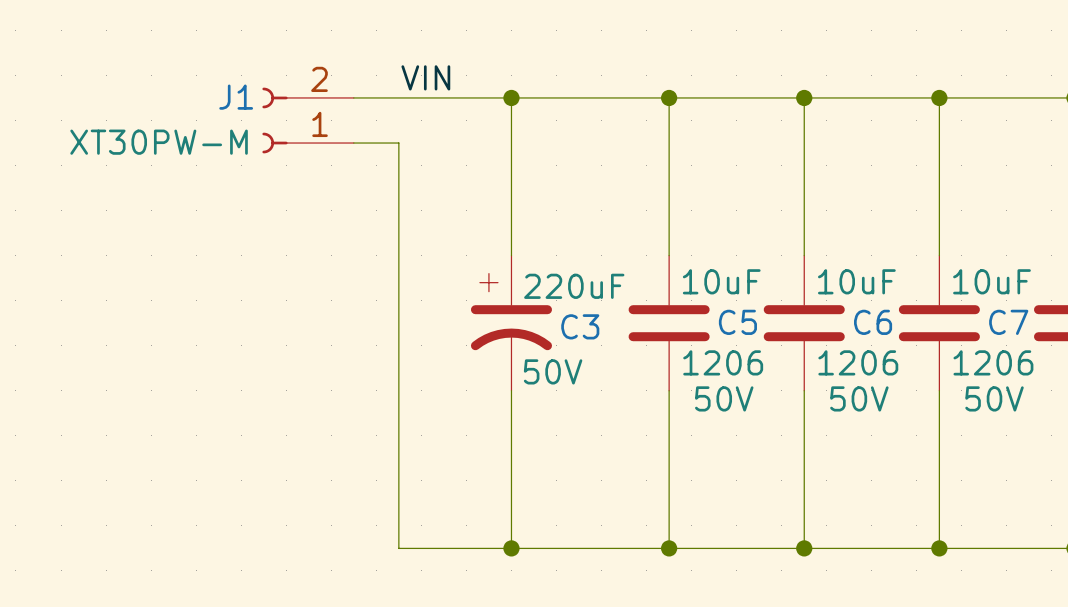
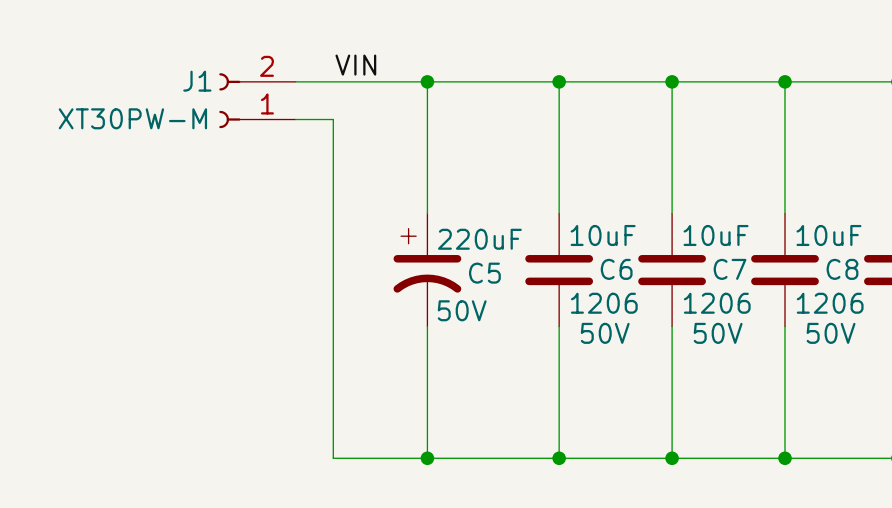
C5 name: C5 (737, 322) -> C6 (616, 269)
C6 name: C6 (873, 322) -> C7 (730, 269)
C7 name: C7 (1008, 322) -> C8 (842, 269)
C3 name: C3 (580, 326) -> C5 (484, 273)

